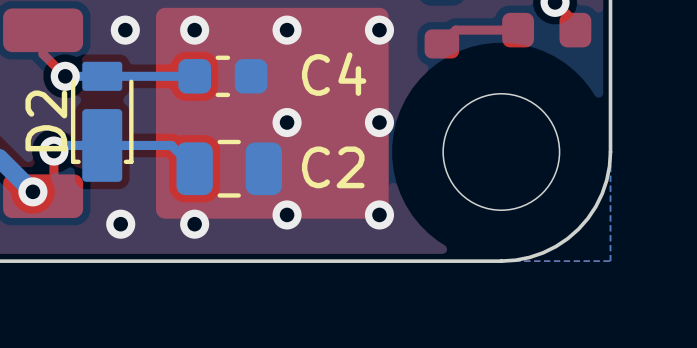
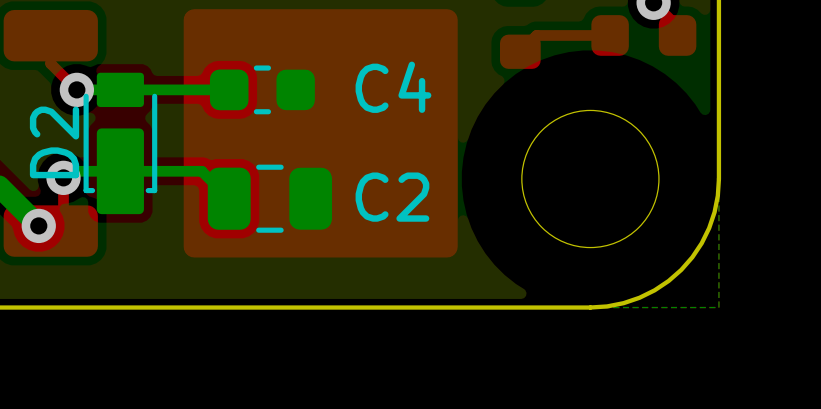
via: (125, 30) -> none
via: (194, 30) -> none
via: (287, 30) -> none
via: (379, 30) -> none
via: (287, 122) -> none
via: (379, 122) -> none
via: (287, 214) -> none
via: (379, 214) -> none
via: (120, 224) -> none
via: (194, 224) -> none

